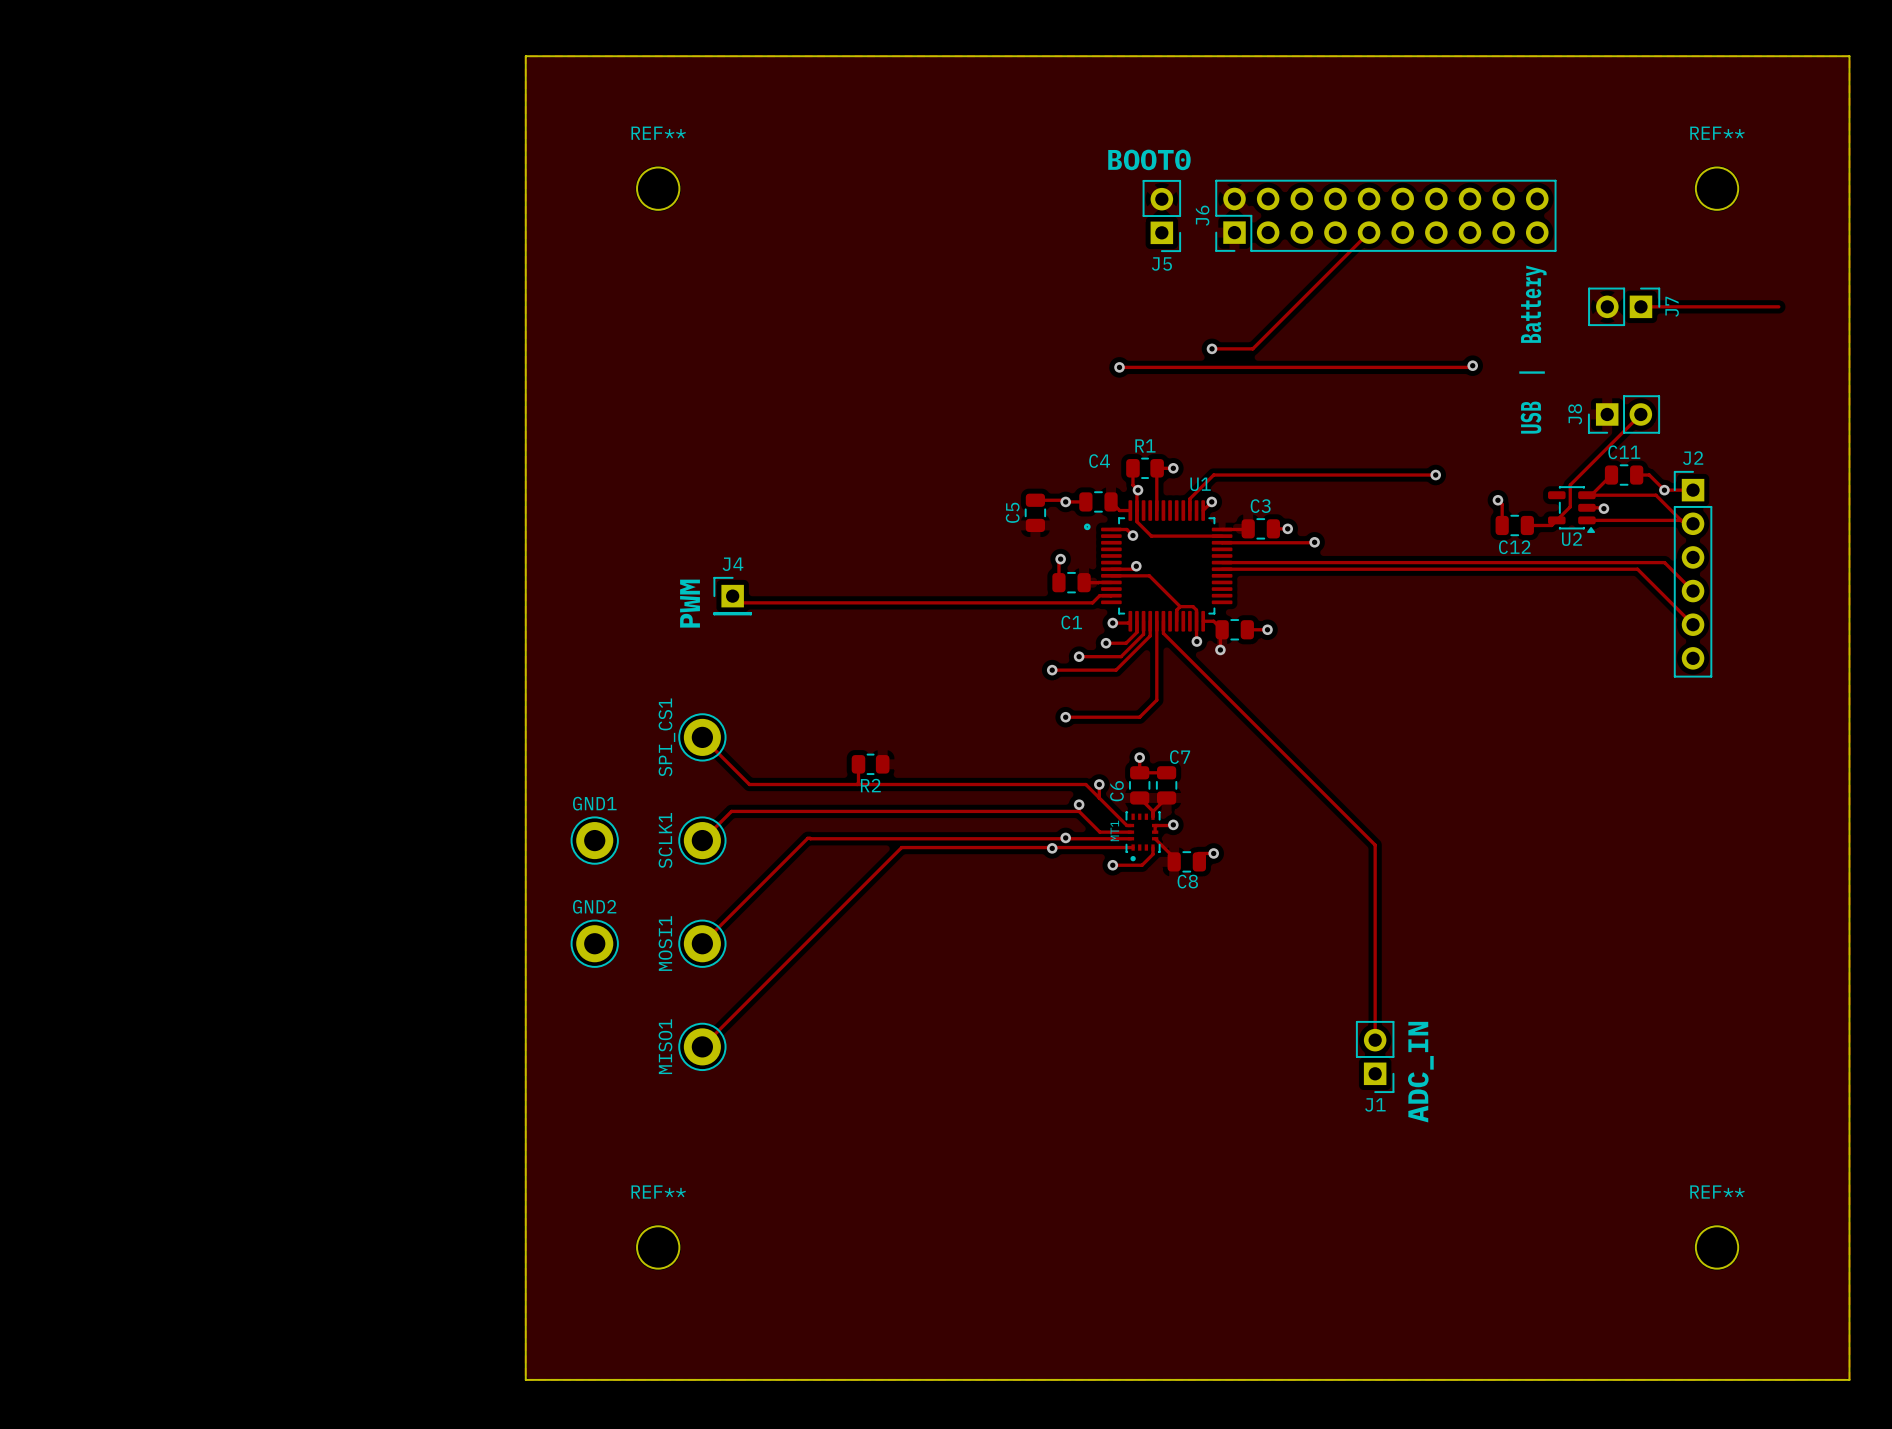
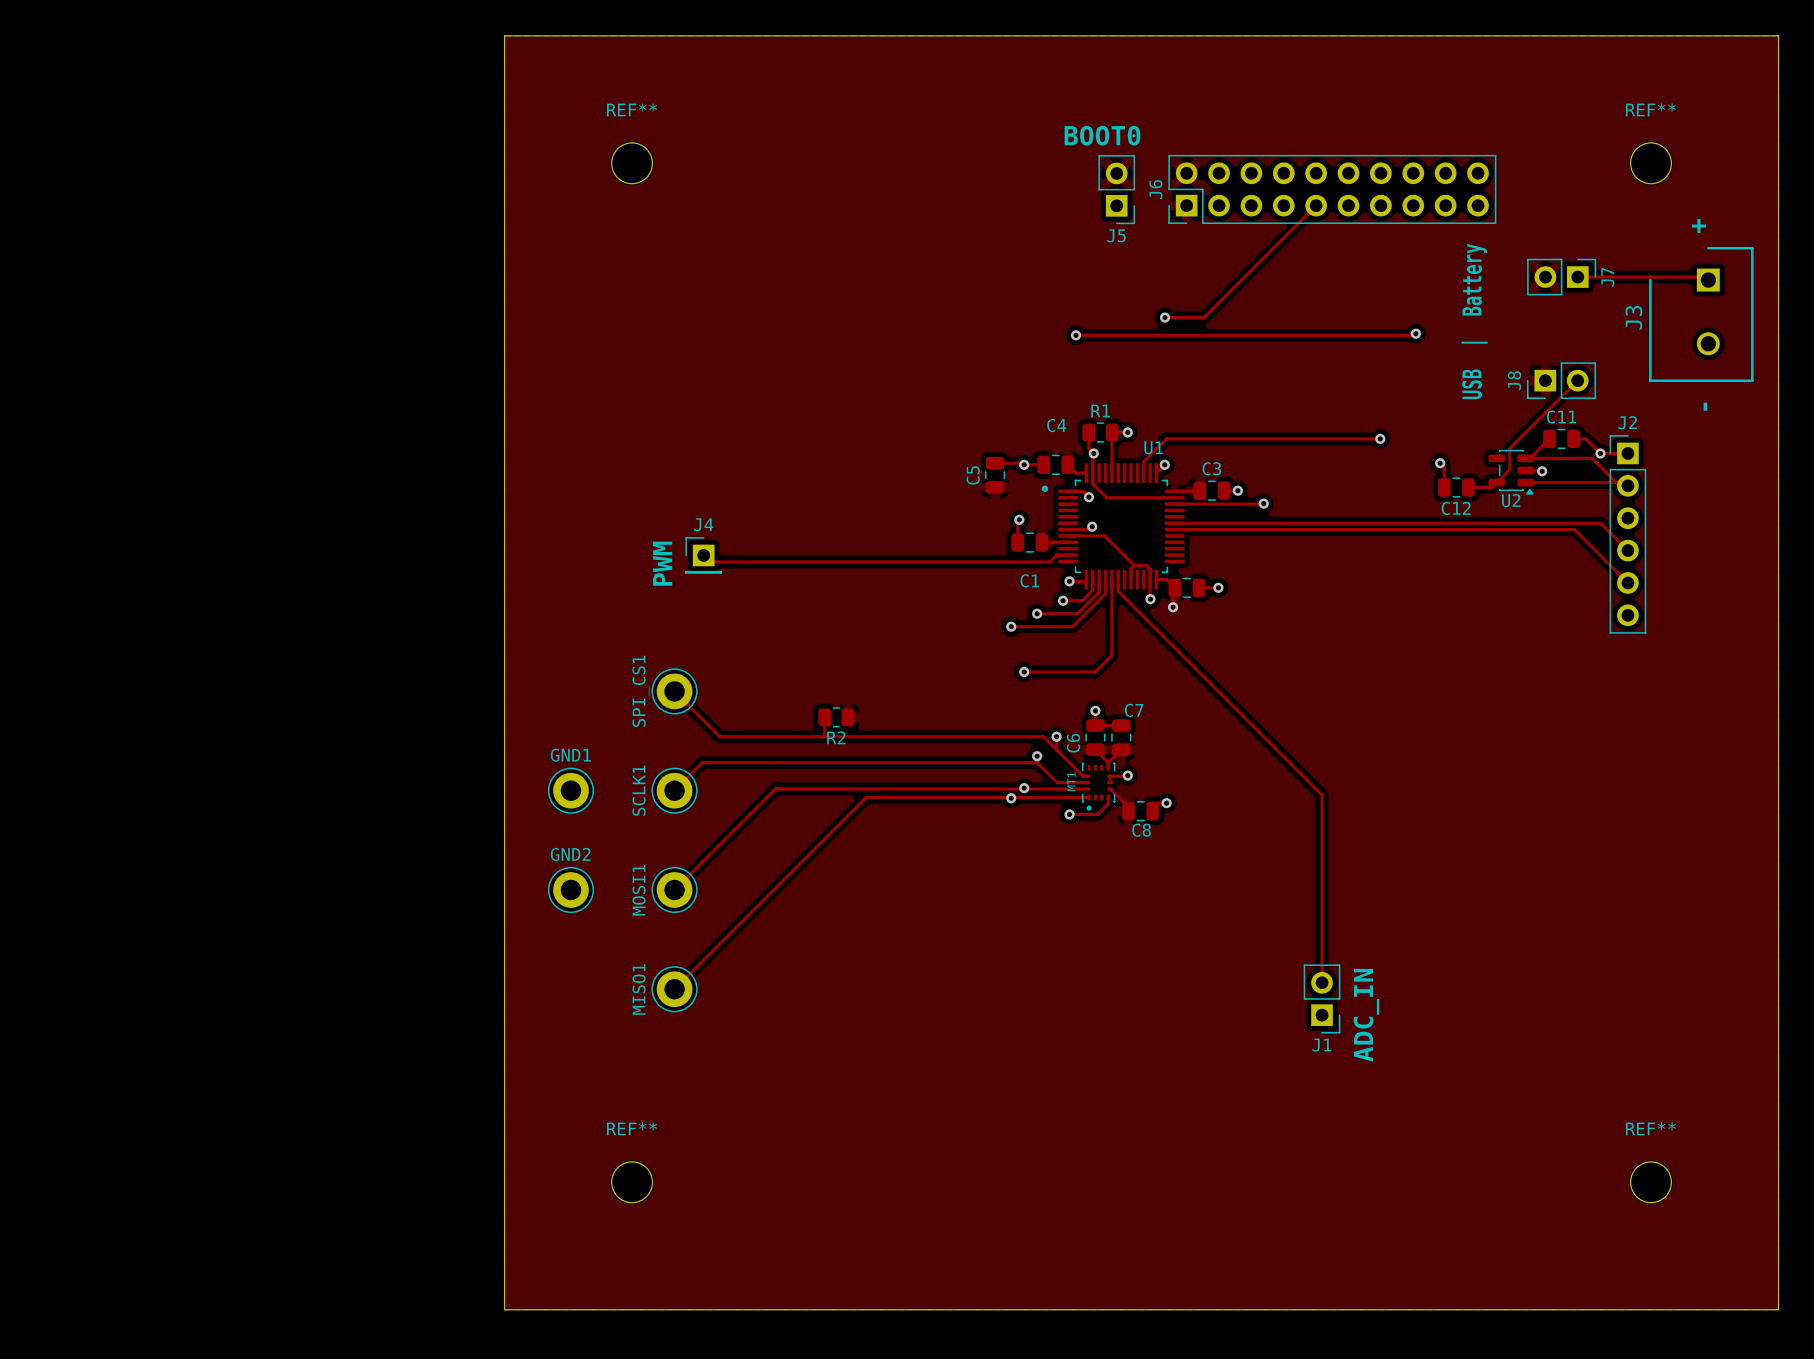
text: none -> + (1698, 226)
J3: none -> (1701, 314)
text: none -> - (1705, 406)

